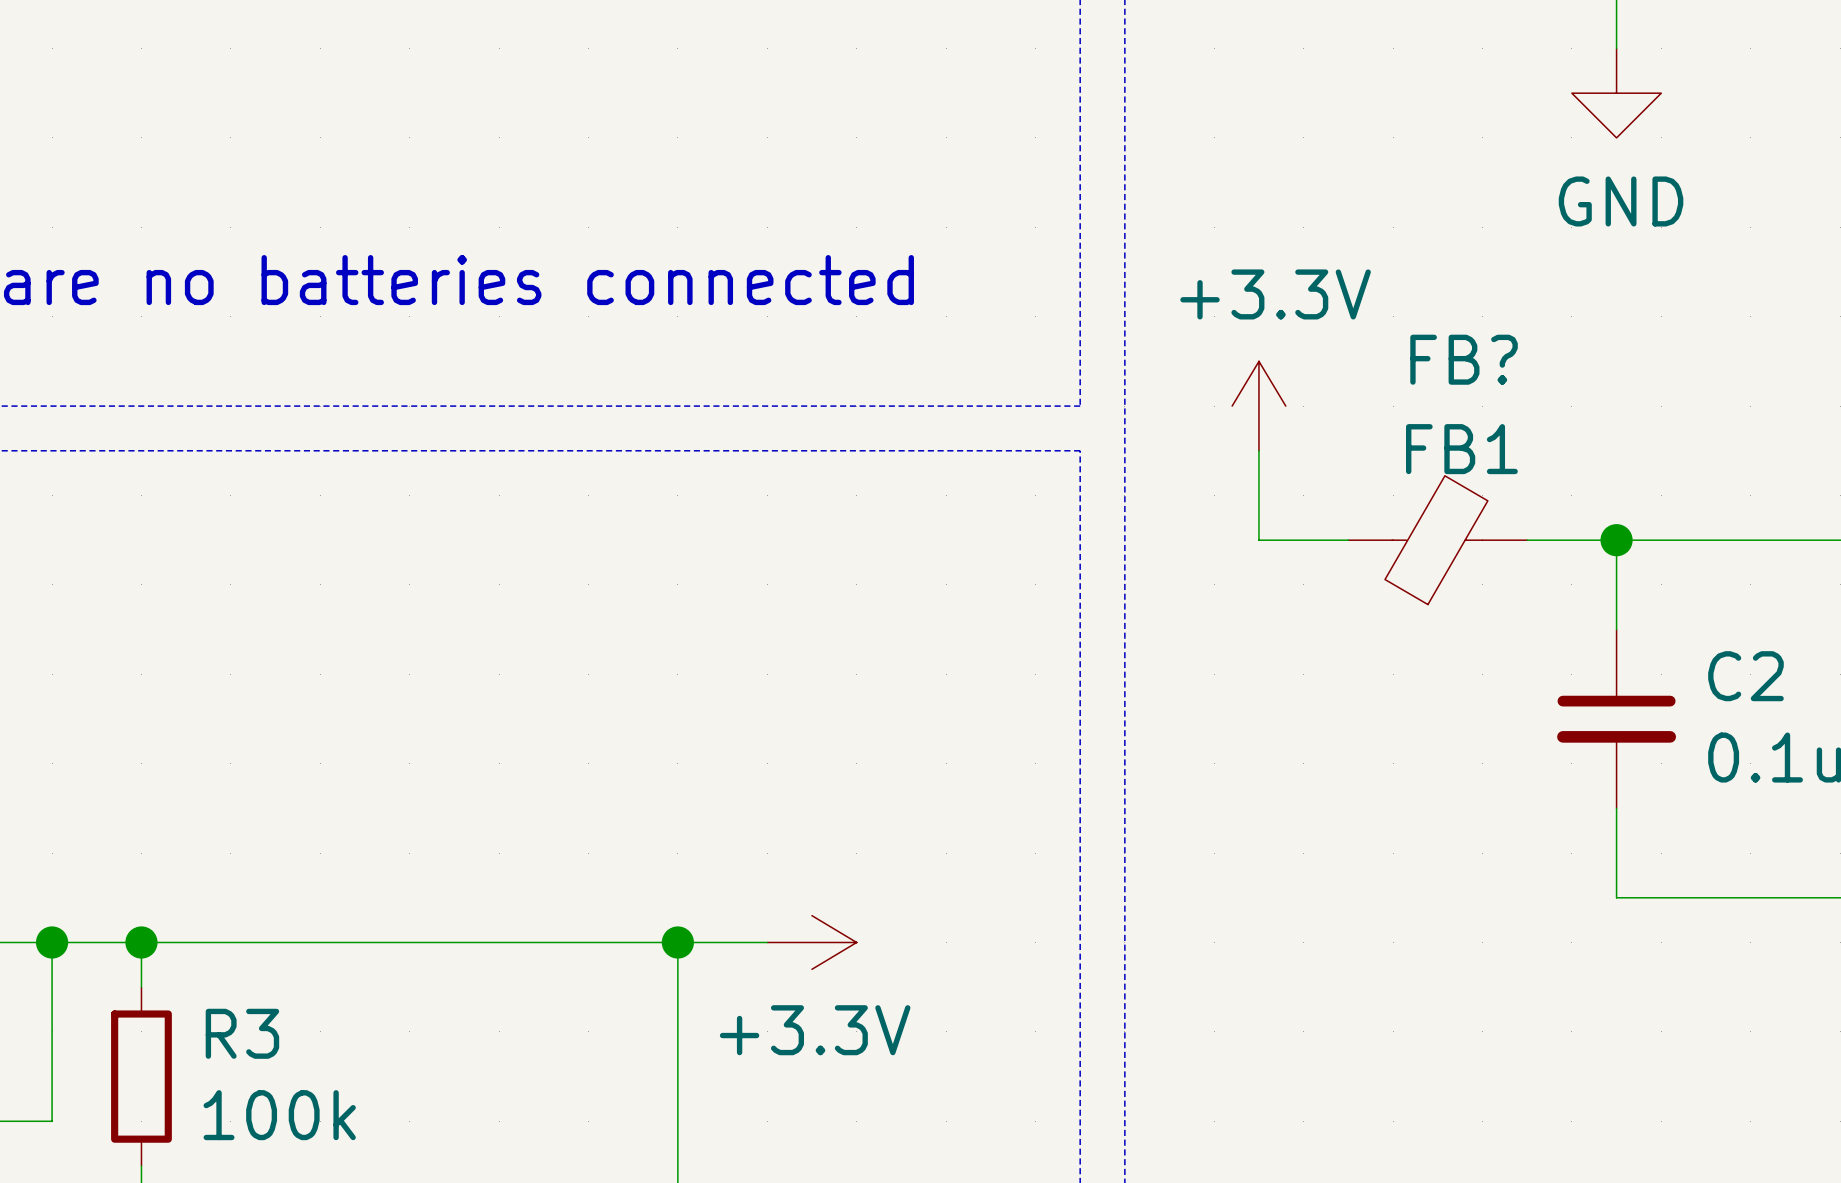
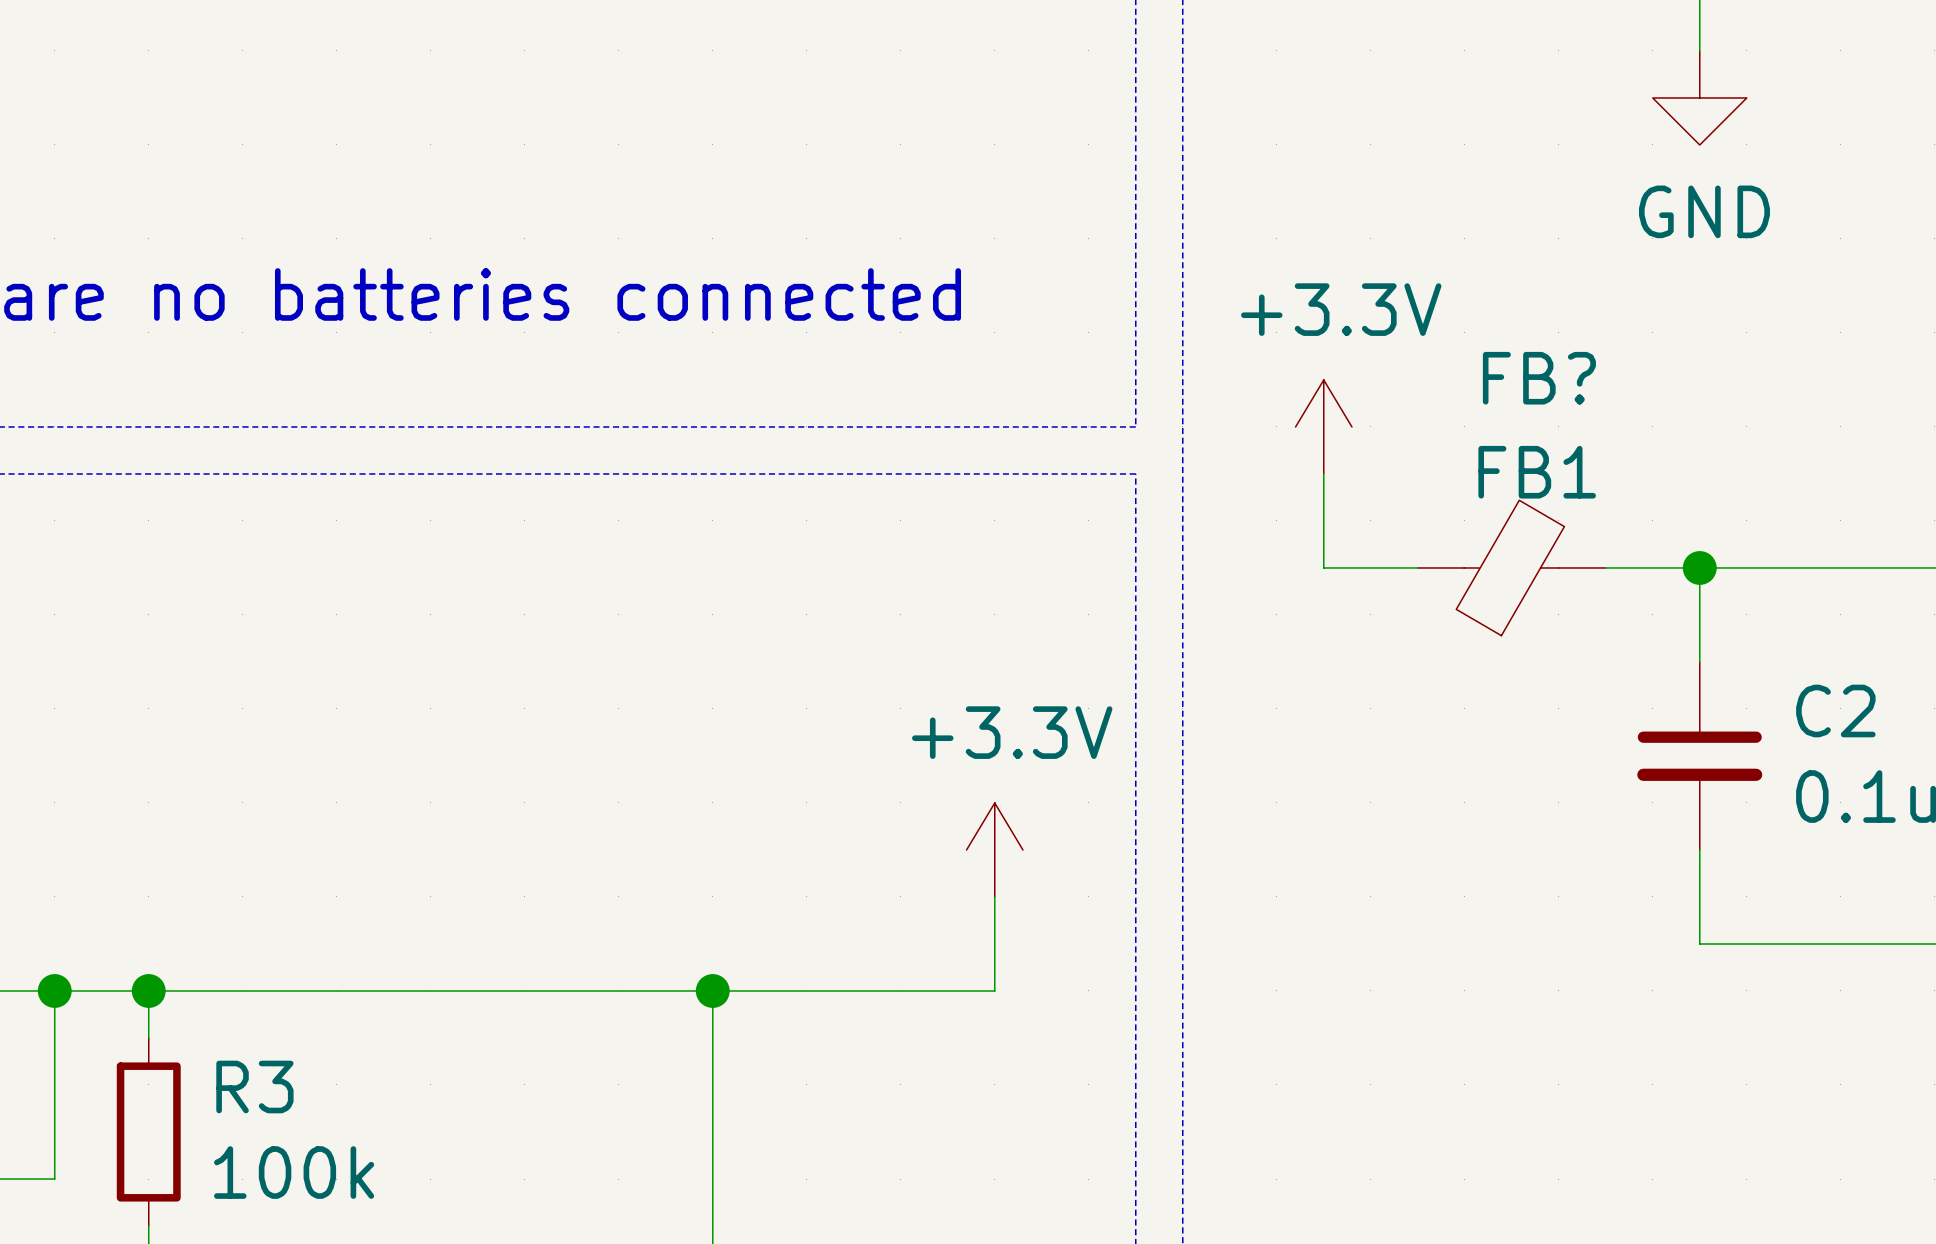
wire: none -> (994, 896) (994, 990) (806, 990)
power symbol rotation: 0° (811, 942) -> 90° counterclockwise (994, 849)
power symbol position: +3.3V (811, 942) -> +3.3V (994, 849)
power symbol text position: +3.3V (815, 1030) -> +3.3V (1012, 732)

